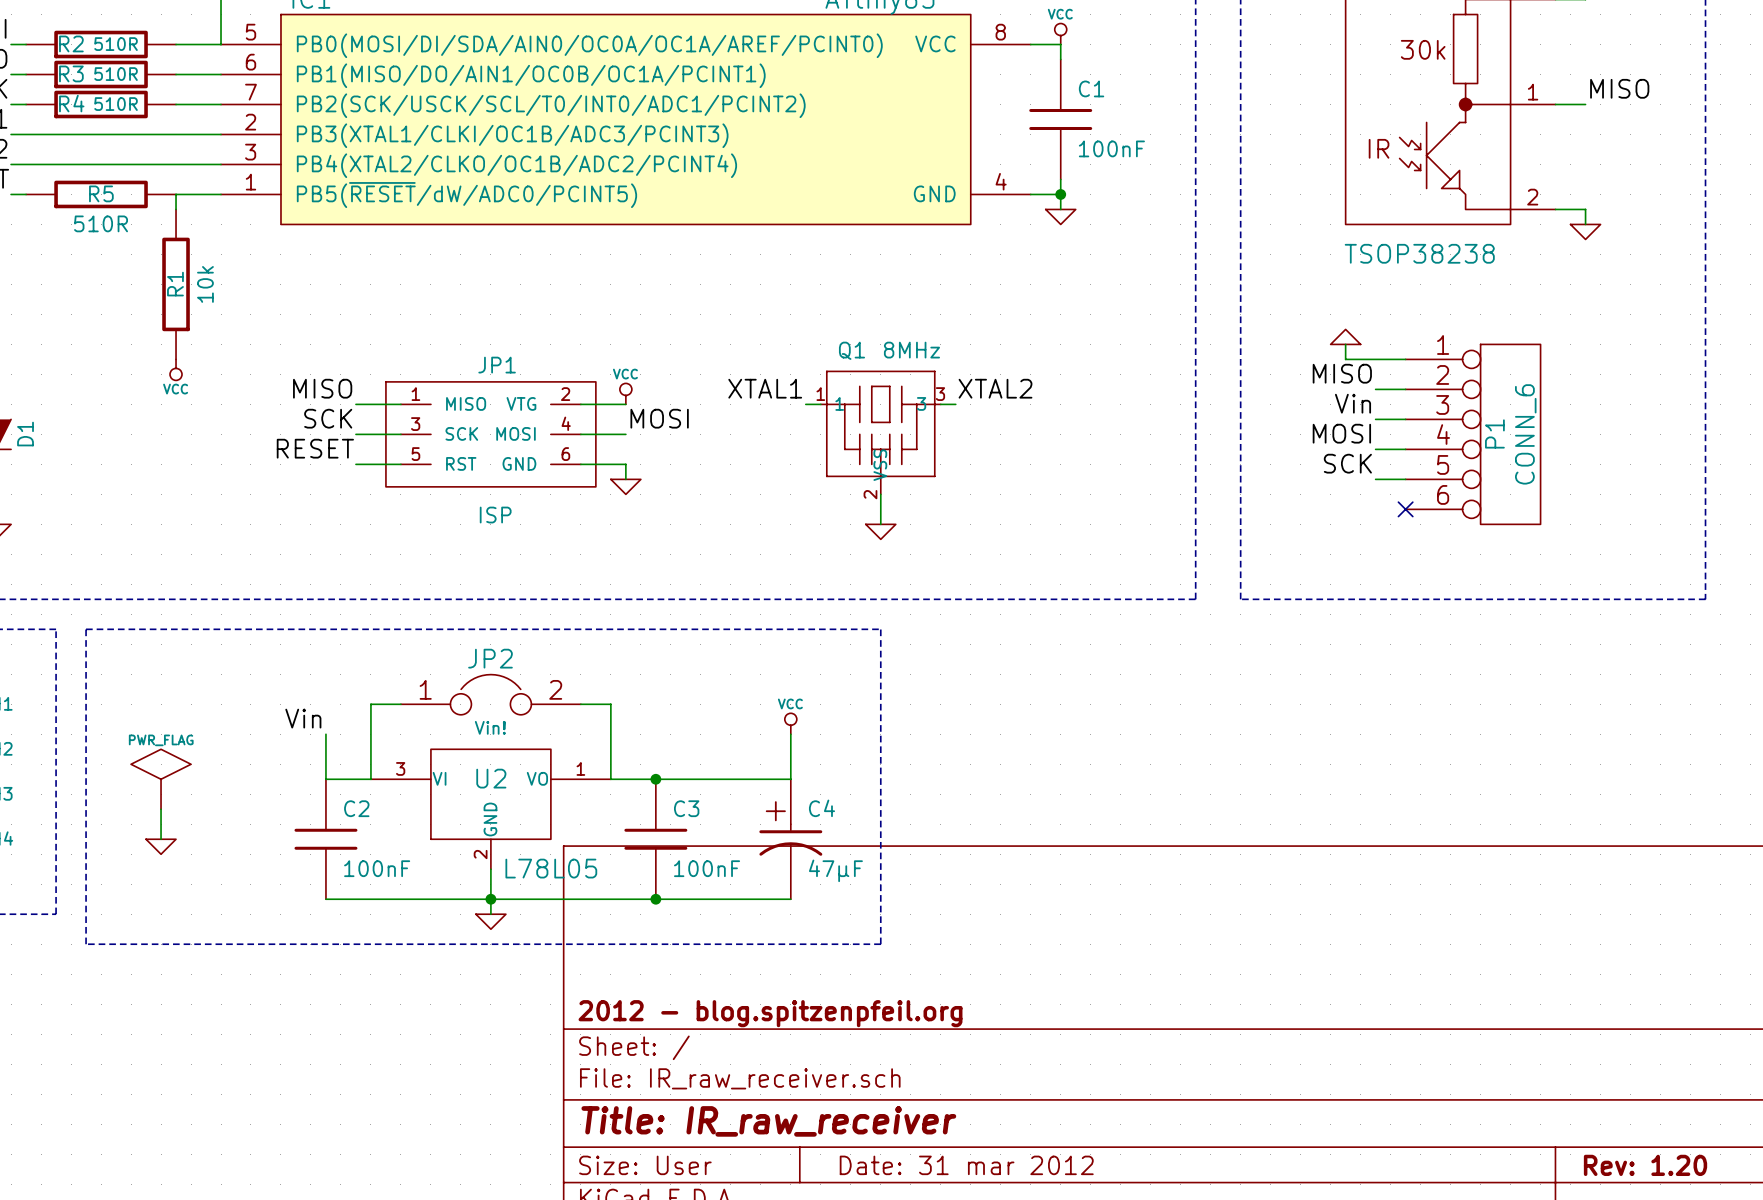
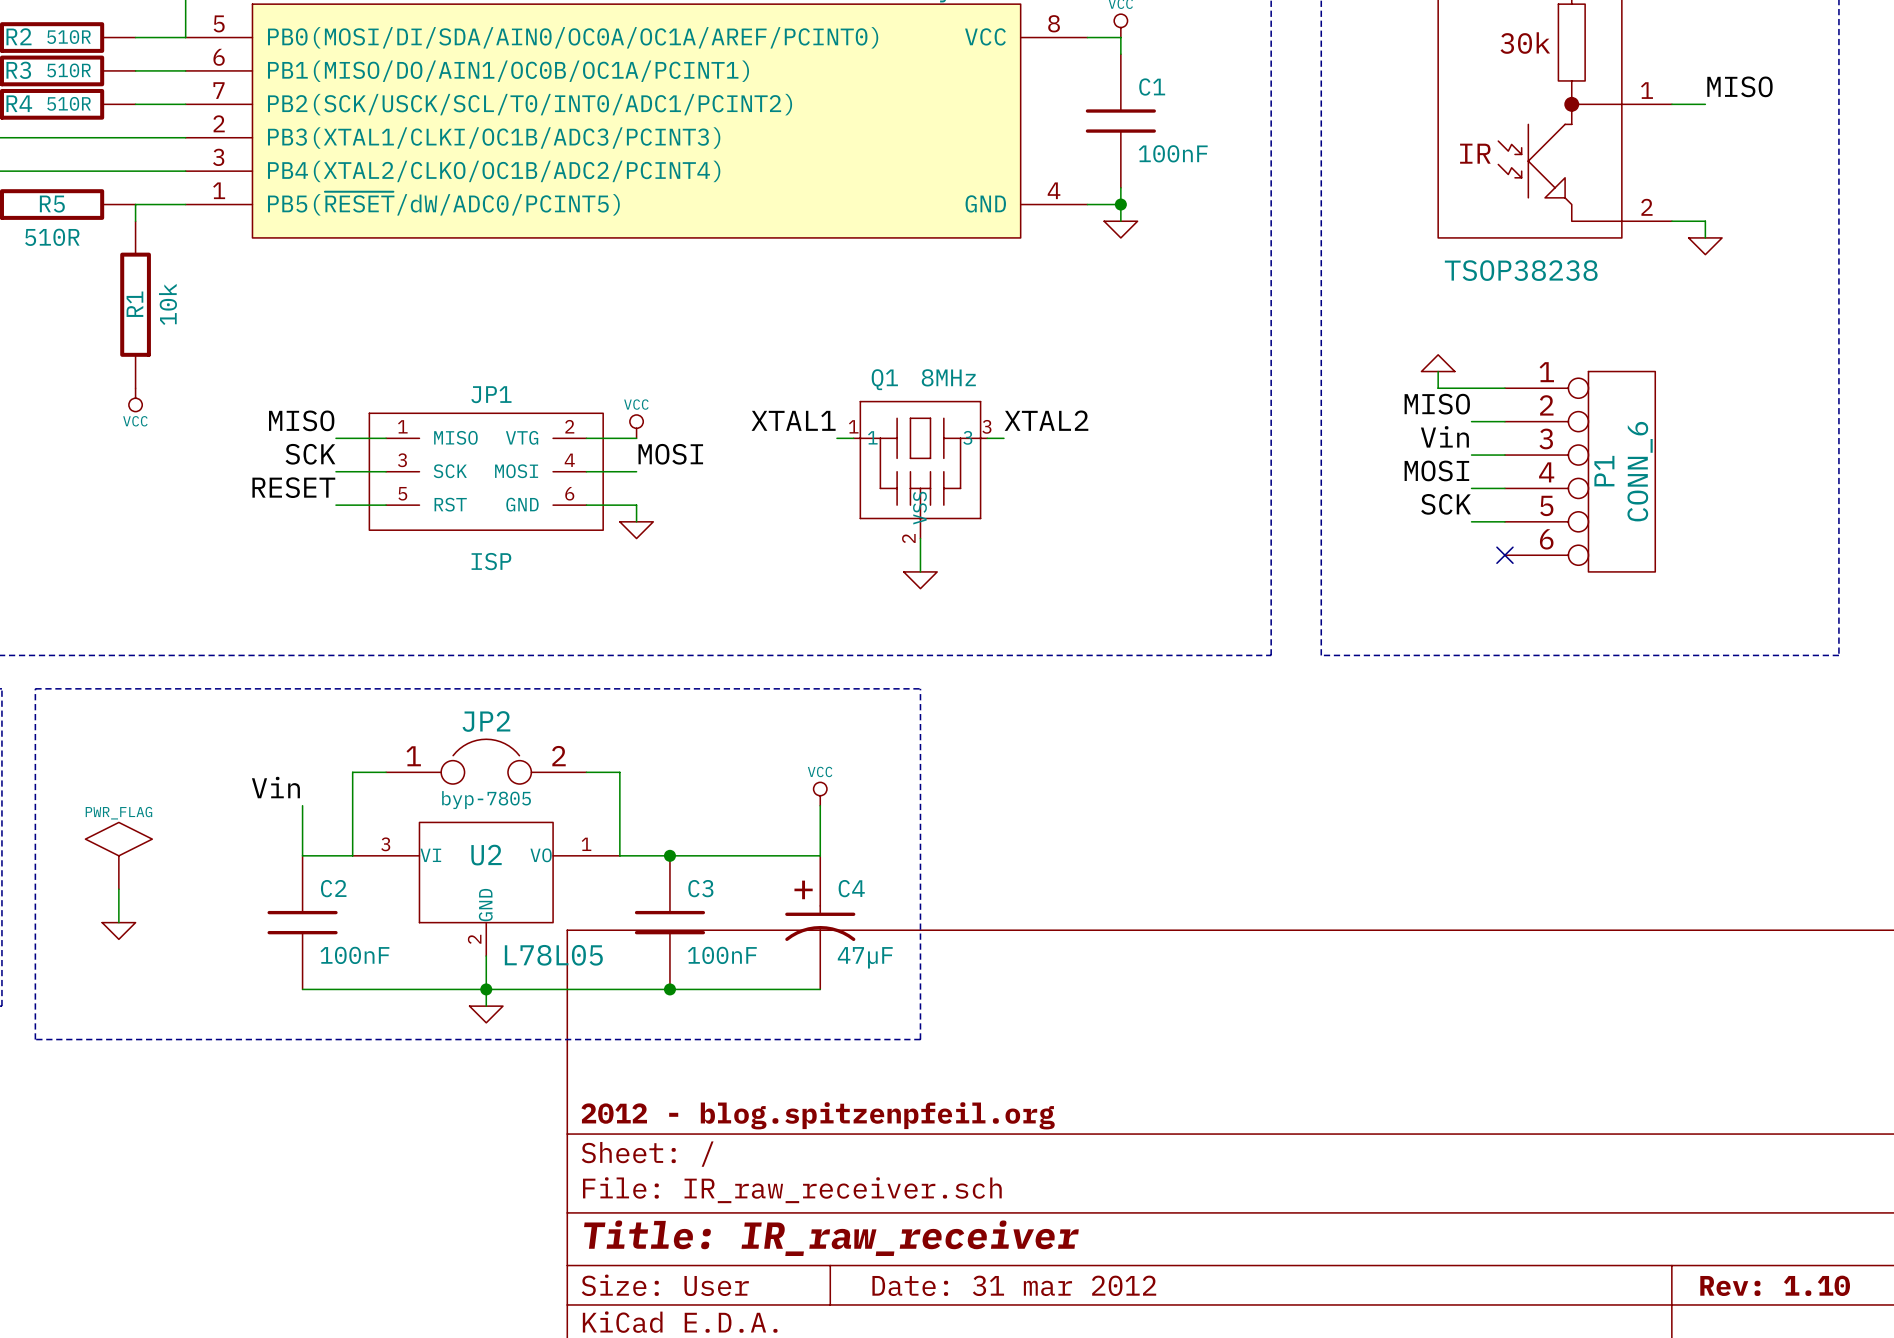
JP2 value: Vin! (490, 727) -> byp-7805 (486, 800)
title block: Rev: 1.20 (1645, 1165) -> Rev: 1.10 (1775, 1285)

